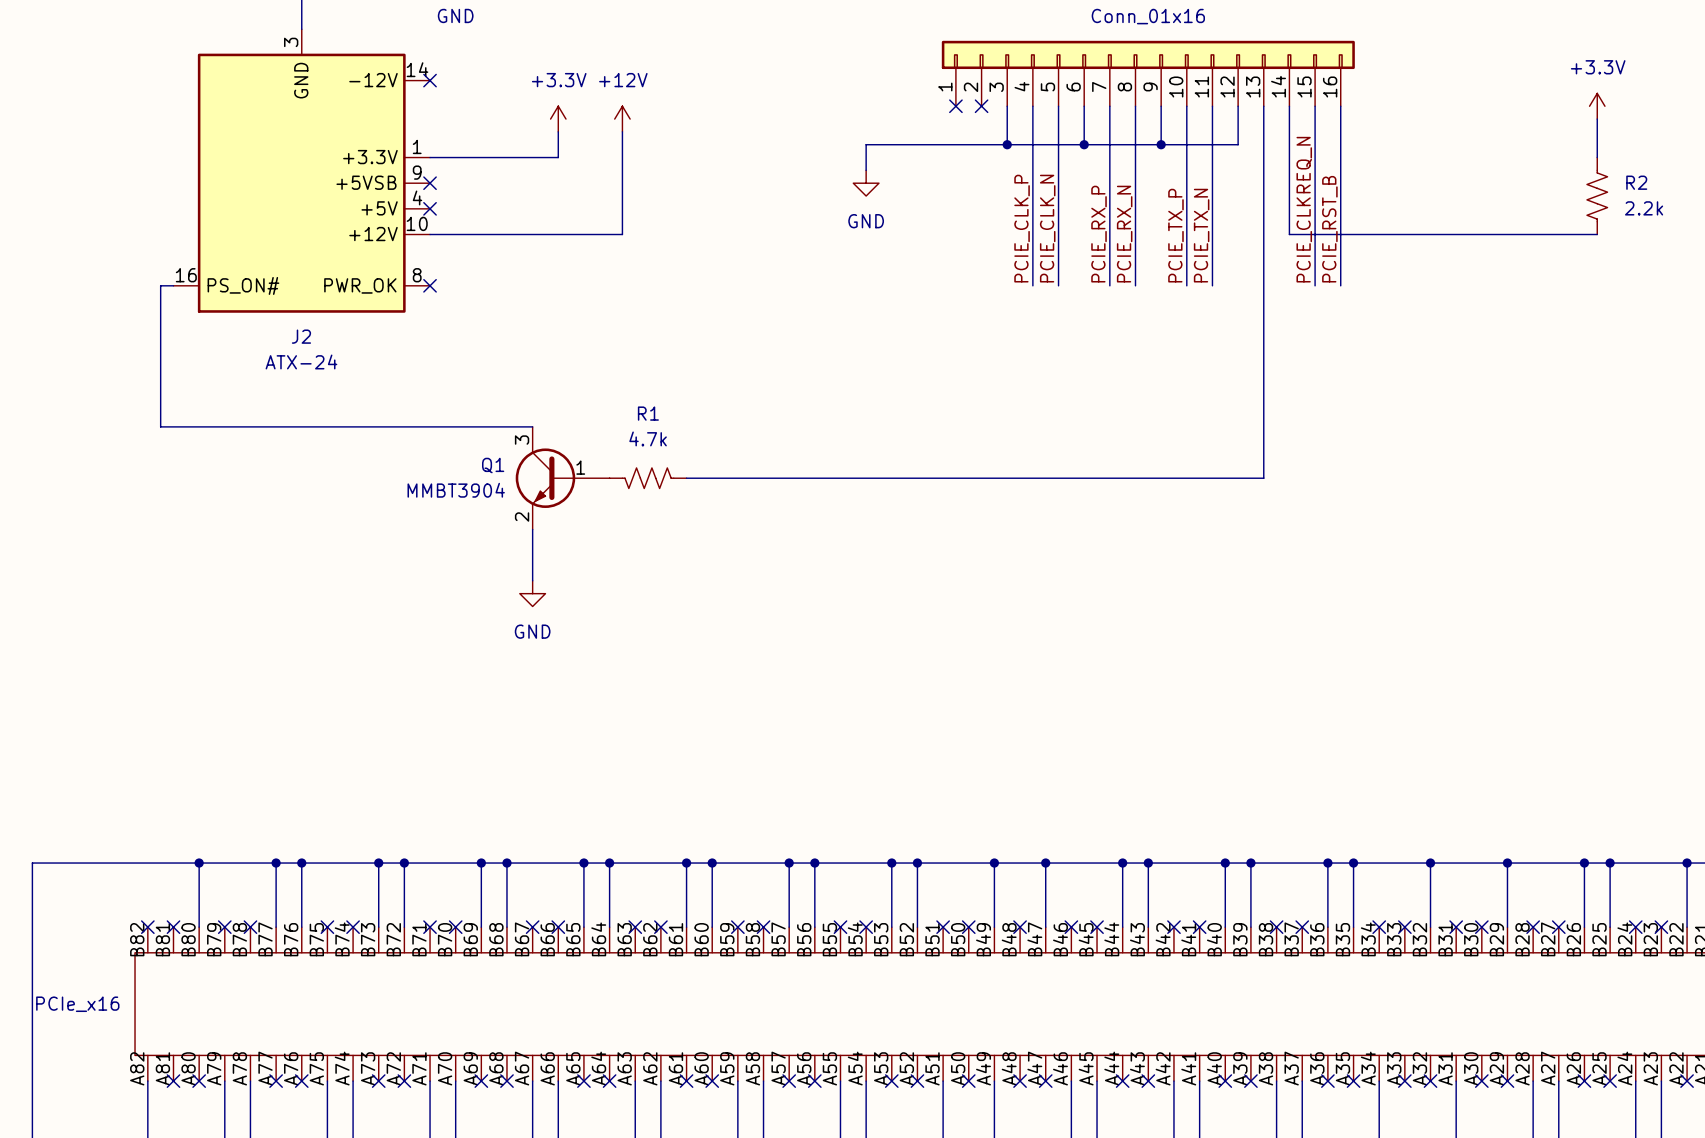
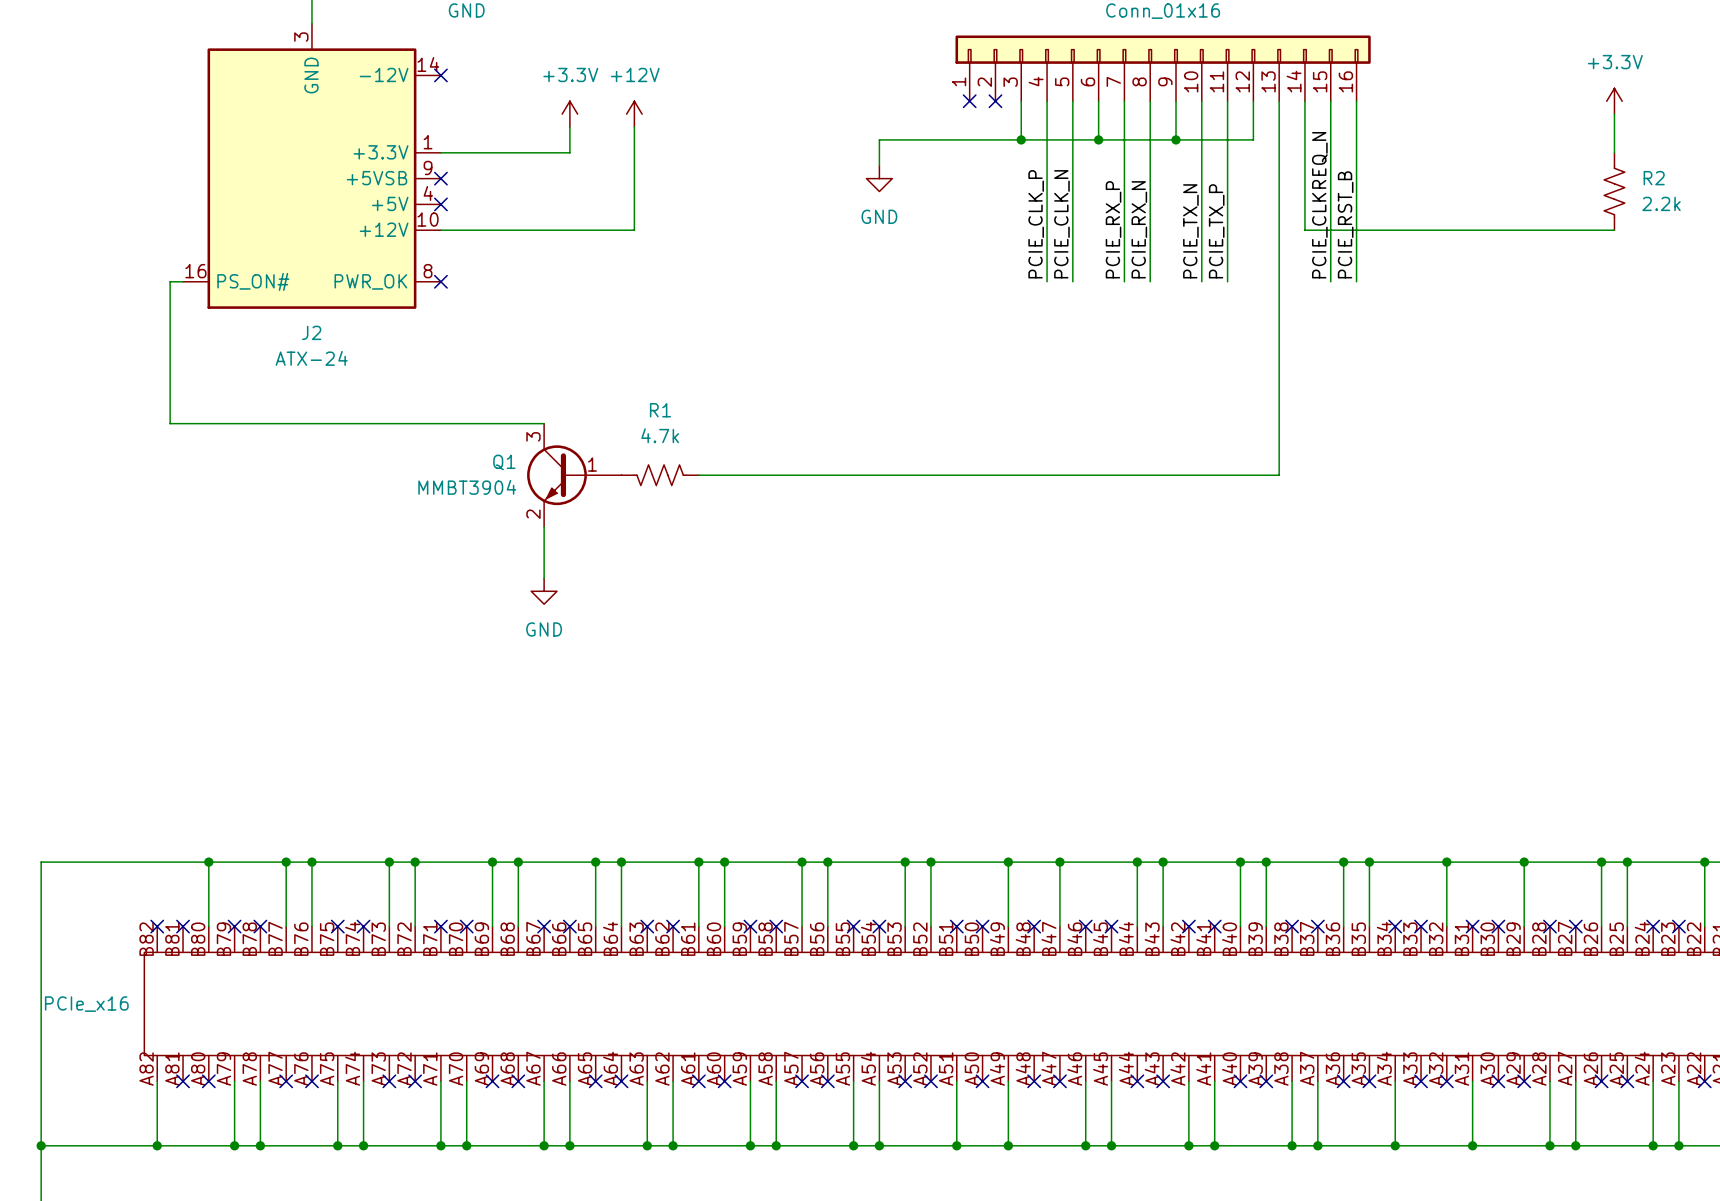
label: PCIE_TX_P (1175, 235) -> PCIE_TX_N (1190, 231)
label: PCIE_TX_N (1201, 235) -> PCIE_TX_P (1216, 231)

